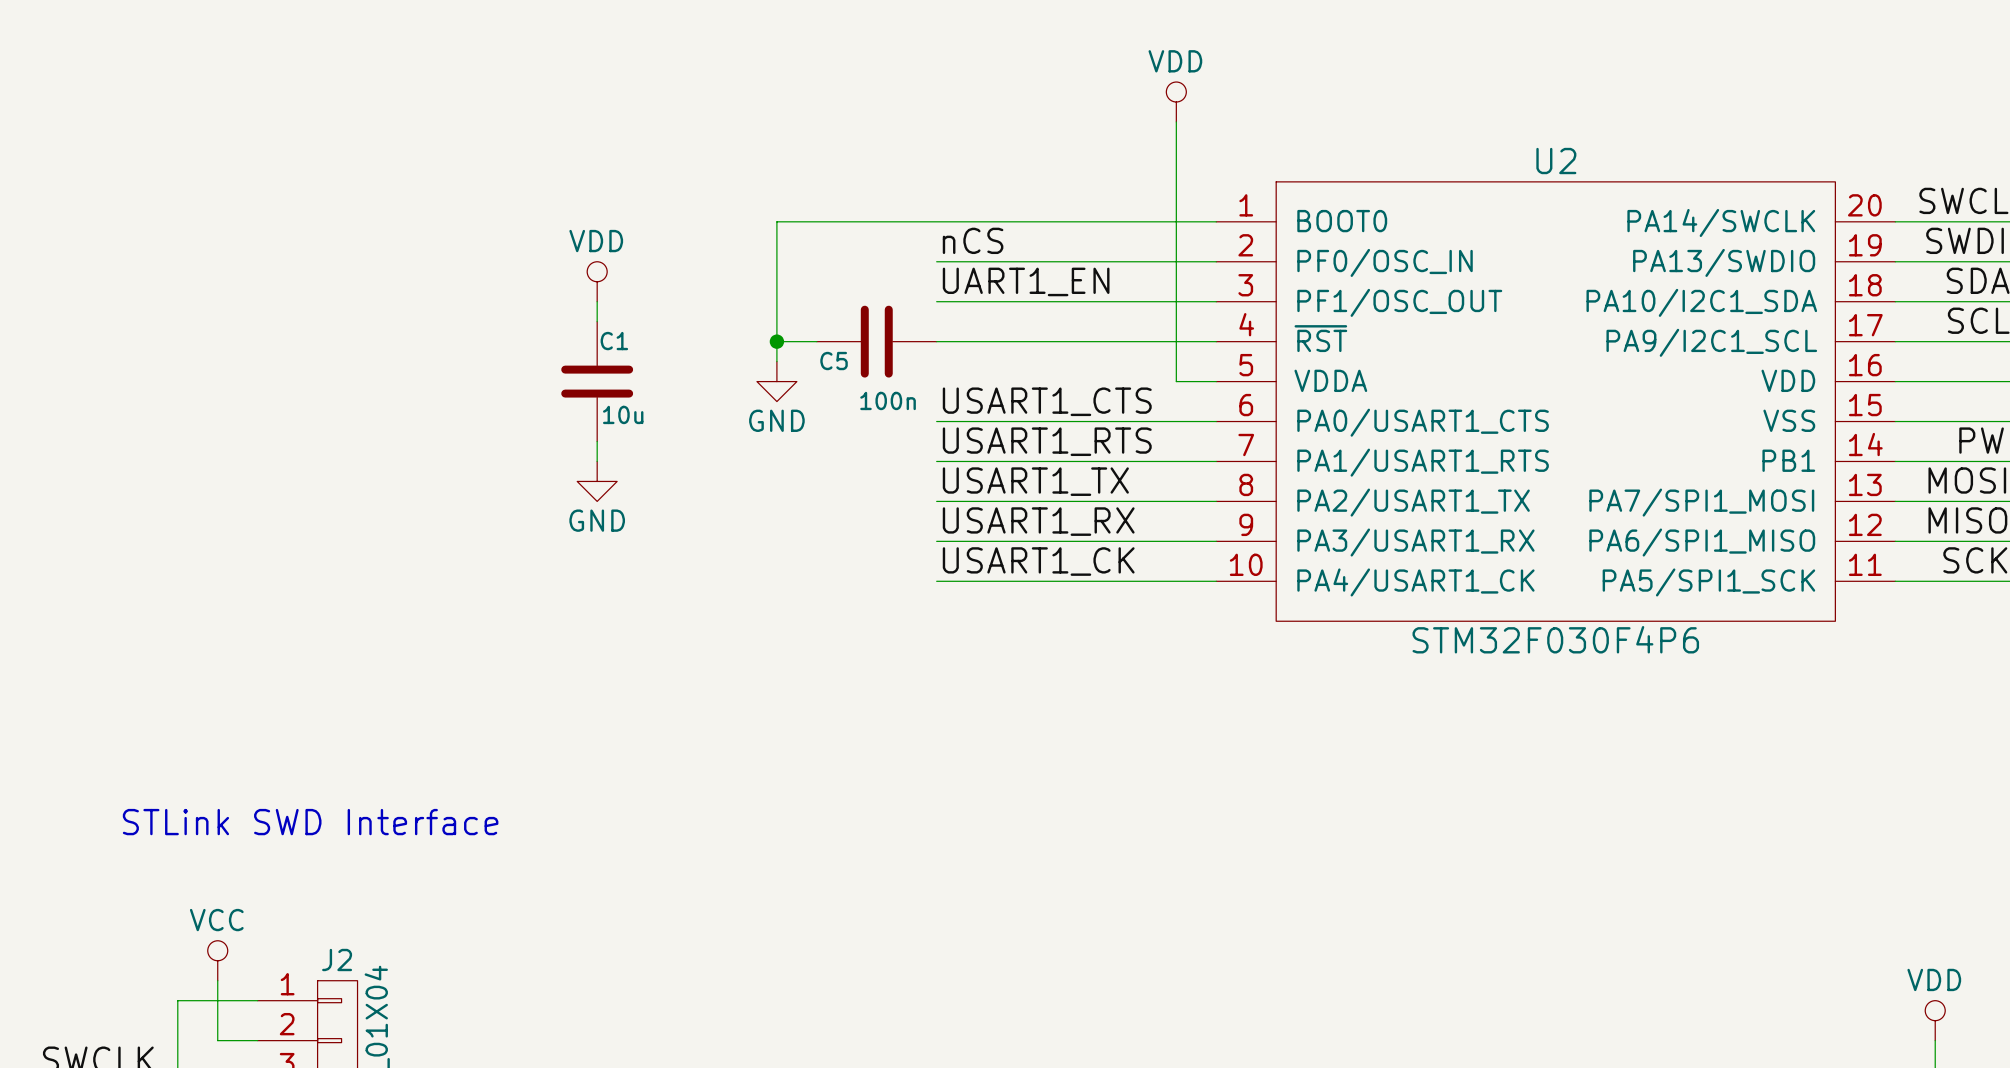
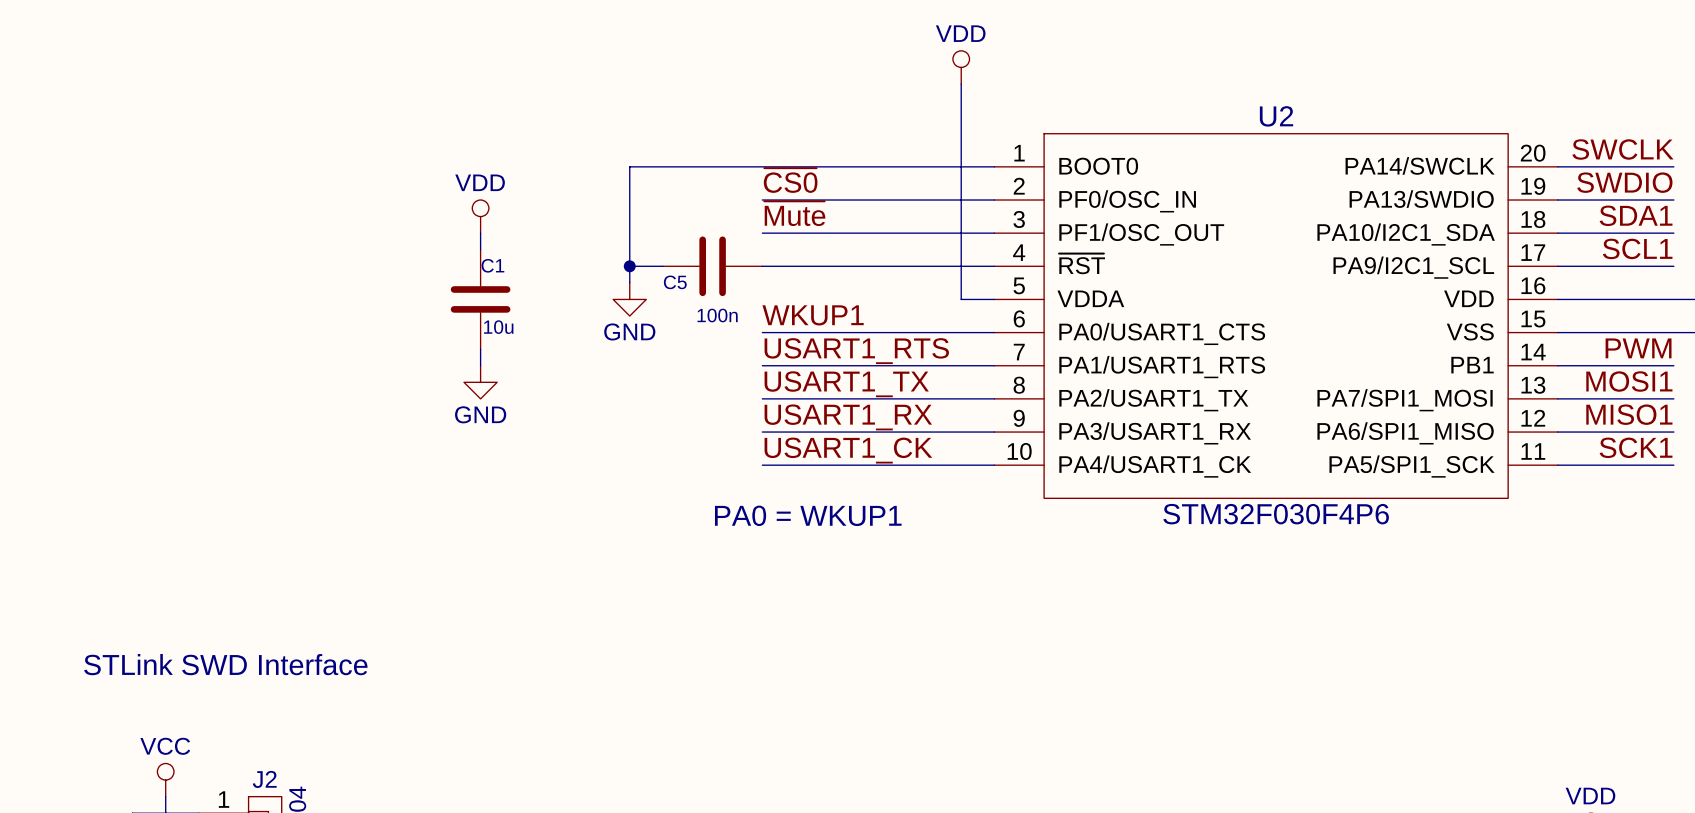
label: nCS (973, 240) -> ~{CS0} (790, 180)
label: UART1_EN (1026, 281) -> ~{Mute} (794, 213)
label: USART1_CTS (1047, 401) -> WKUP1 (813, 315)
text: none -> PA0 = WKUP1 (808, 515)

